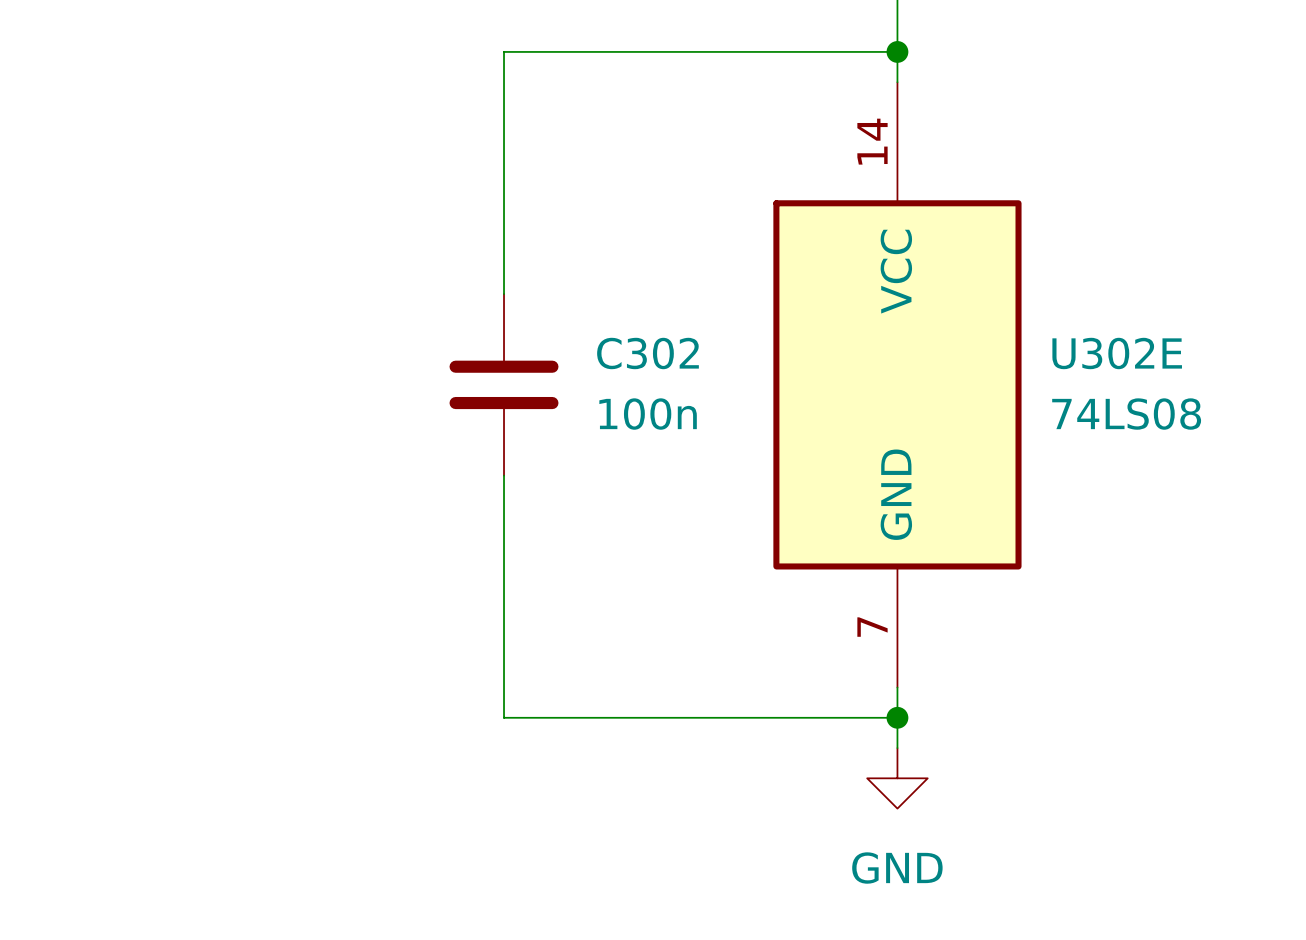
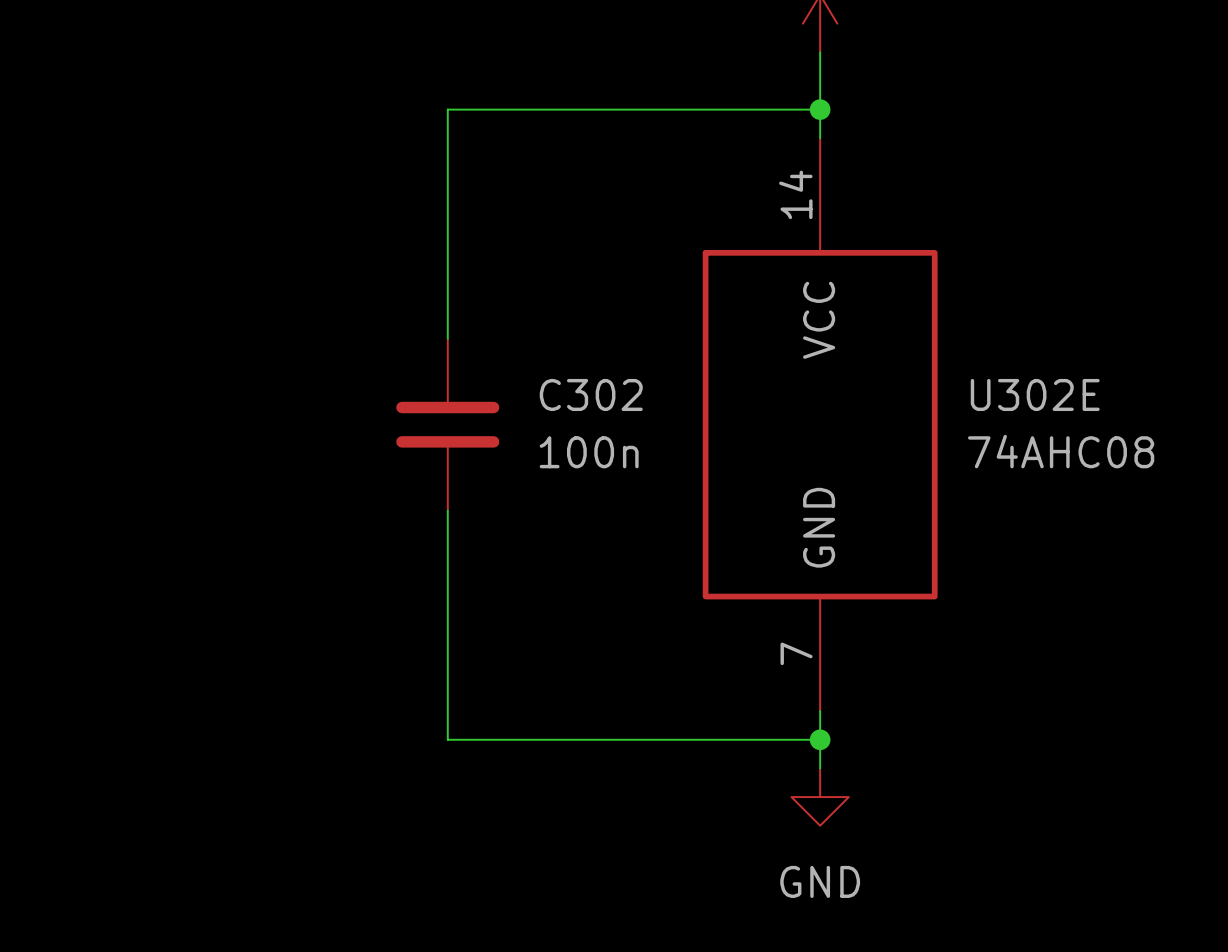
U302E value: 74LS08 (1126, 414) -> 74AHC08 (1061, 451)

